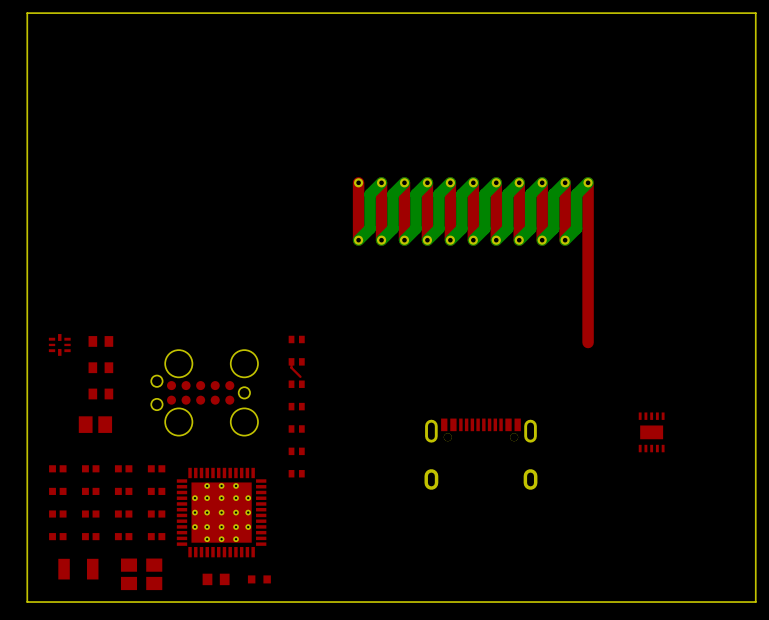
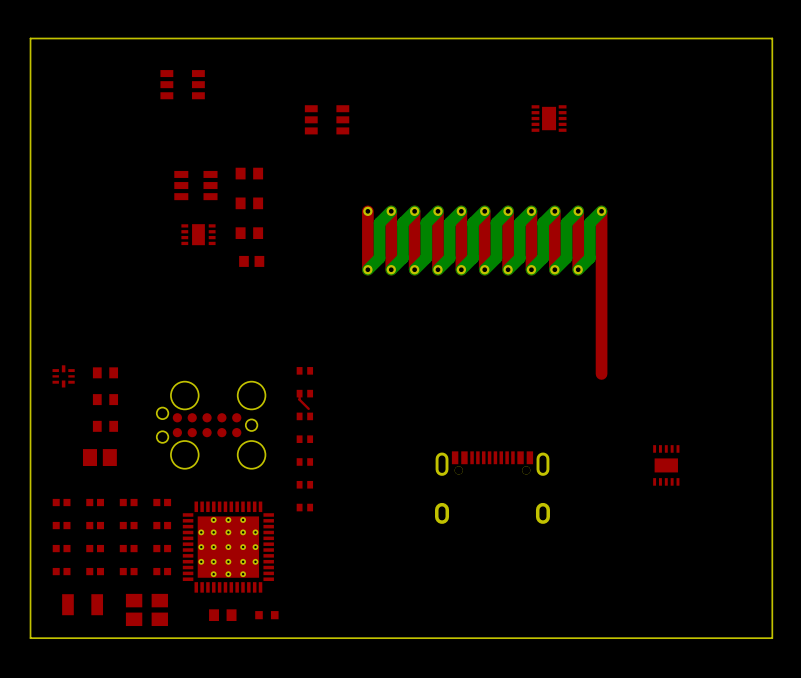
part: none -> (182, 84)
part: none -> (549, 118)
part: none -> (327, 119)
part: none -> (249, 173)
part: none -> (195, 185)
part: none -> (249, 203)
part: none -> (249, 233)
part: none -> (198, 234)
part: none -> (251, 261)

